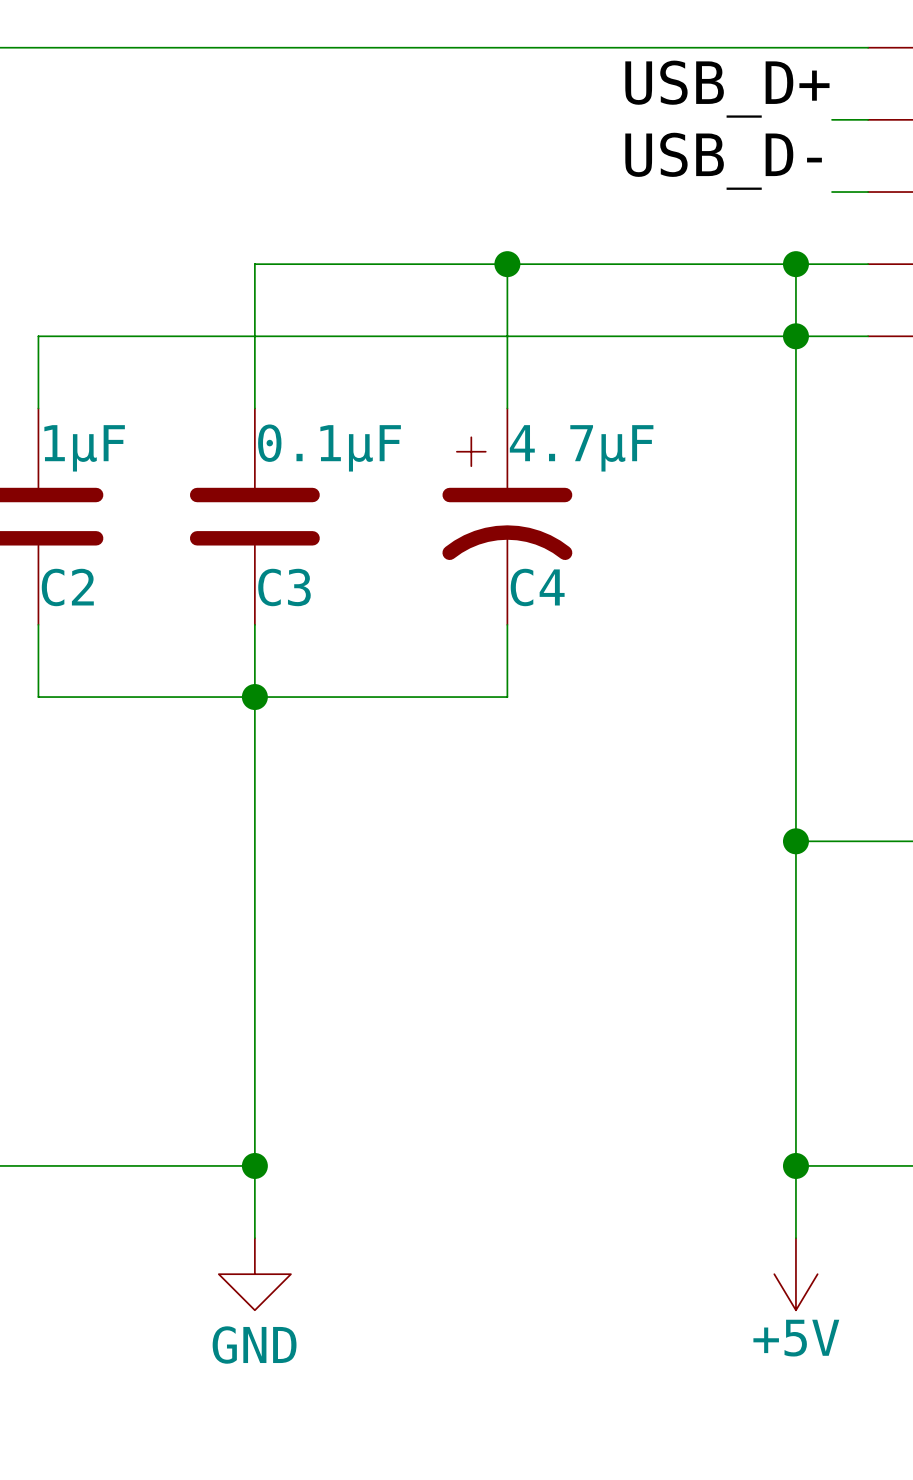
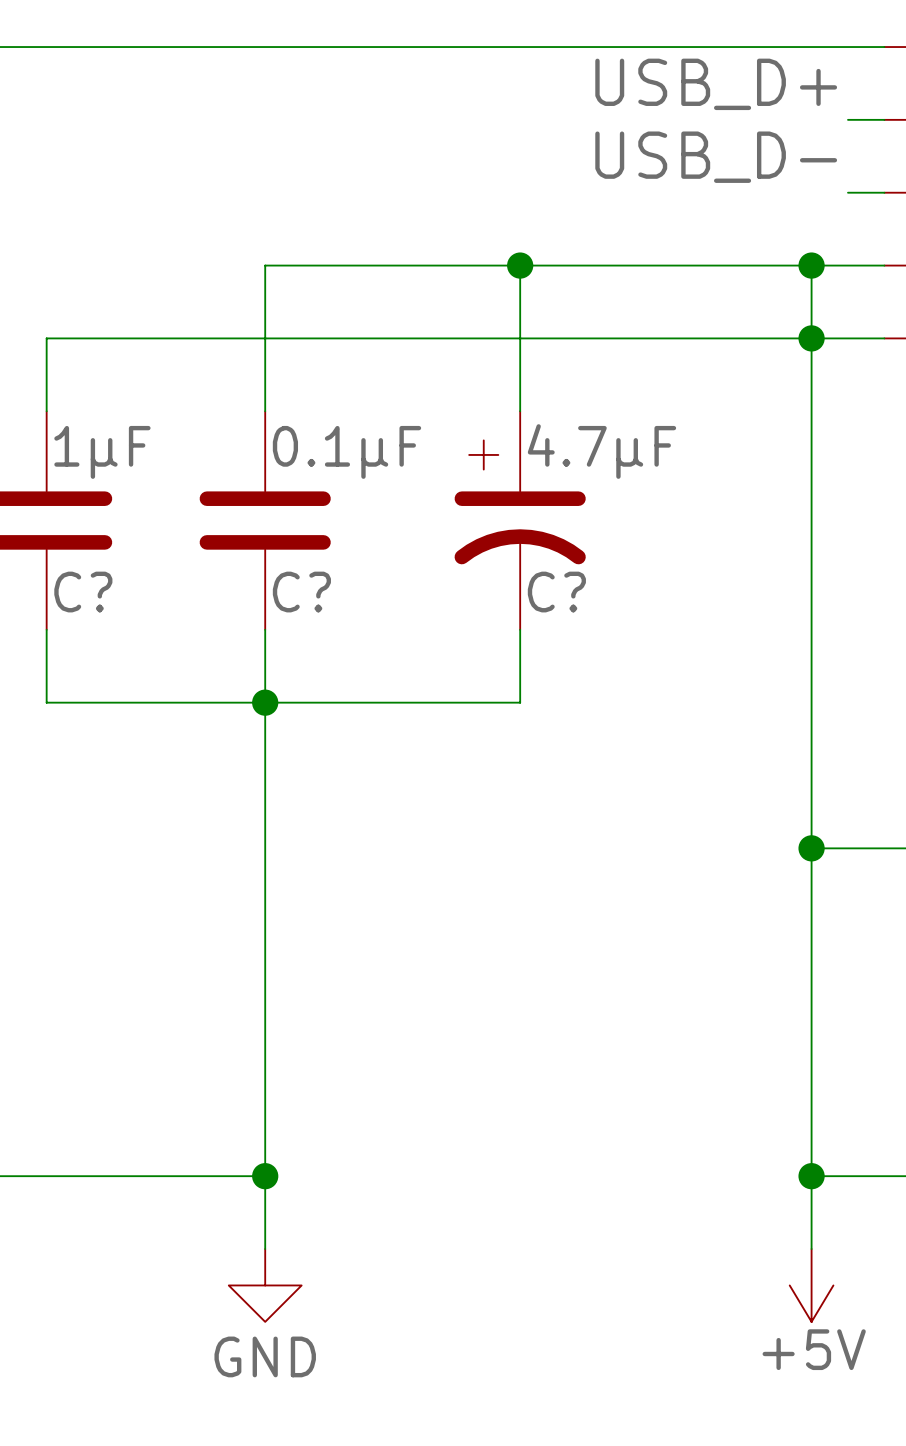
C2 name: C2 (67, 587) -> C? (83, 592)
C3 name: C3 (284, 587) -> C? (301, 592)
C4 name: C4 (537, 587) -> C? (556, 592)

